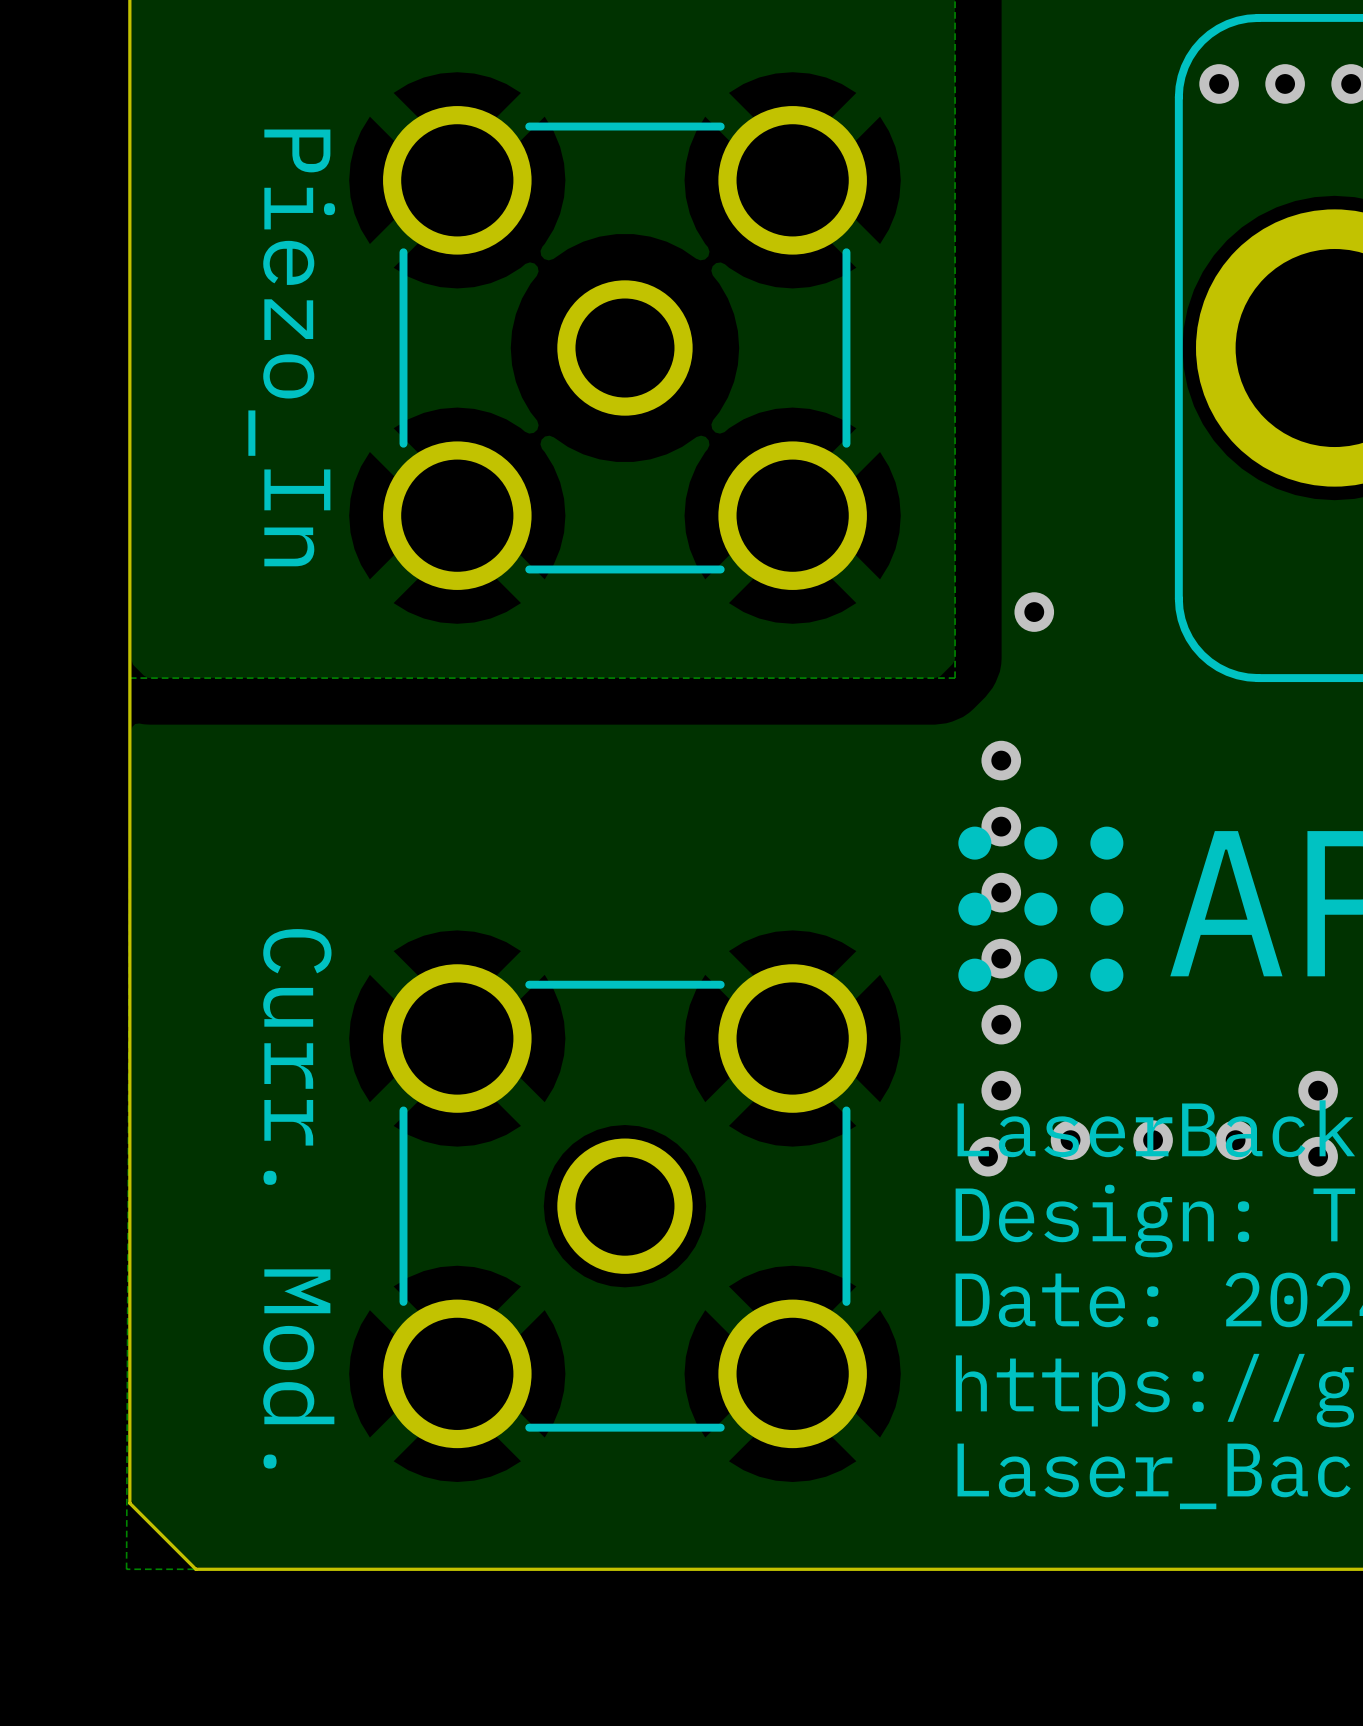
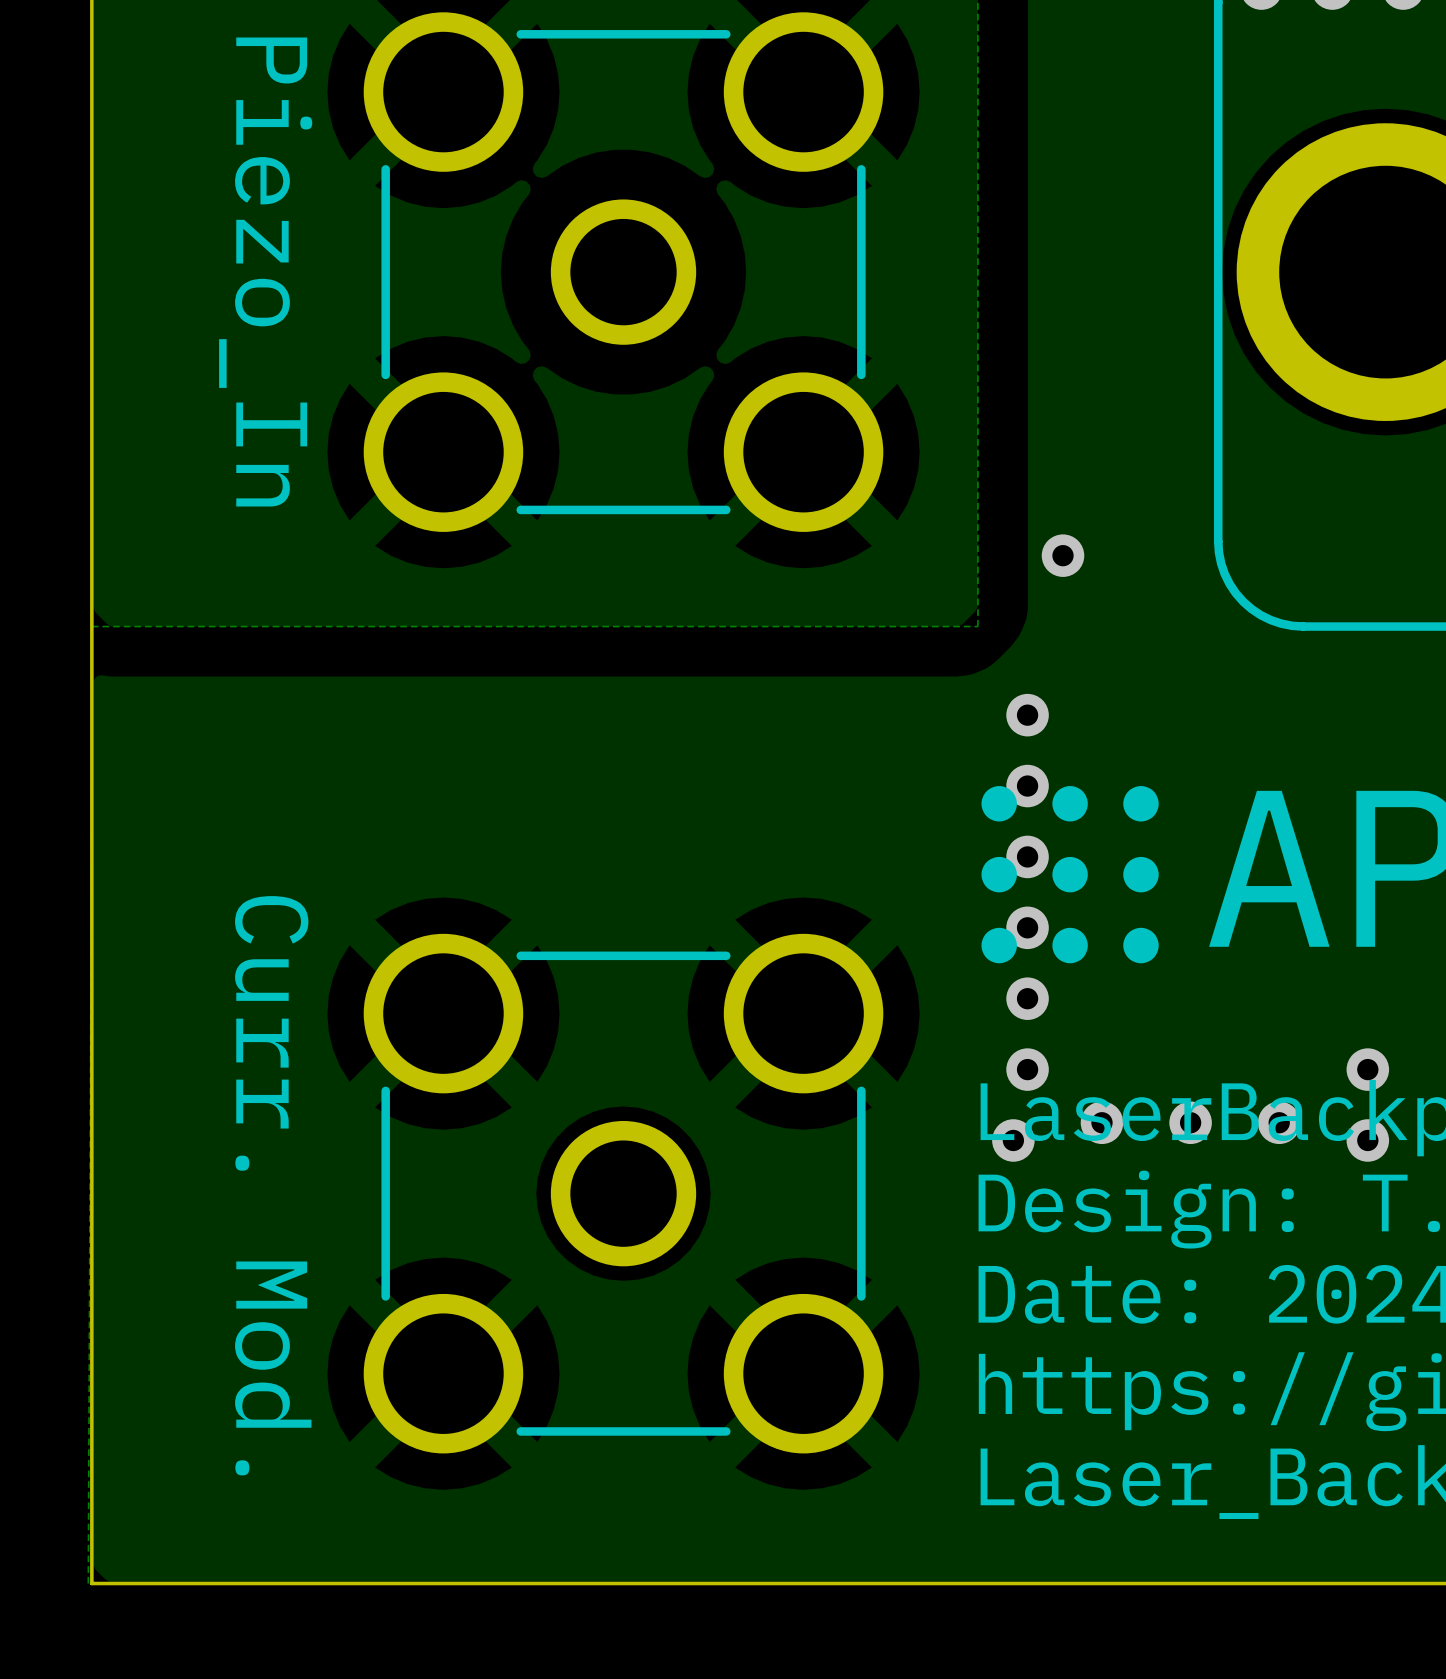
board edge: (129, 1503) (195, 1569) -> (91, 1512) (91, 1583) (162, 1583)

